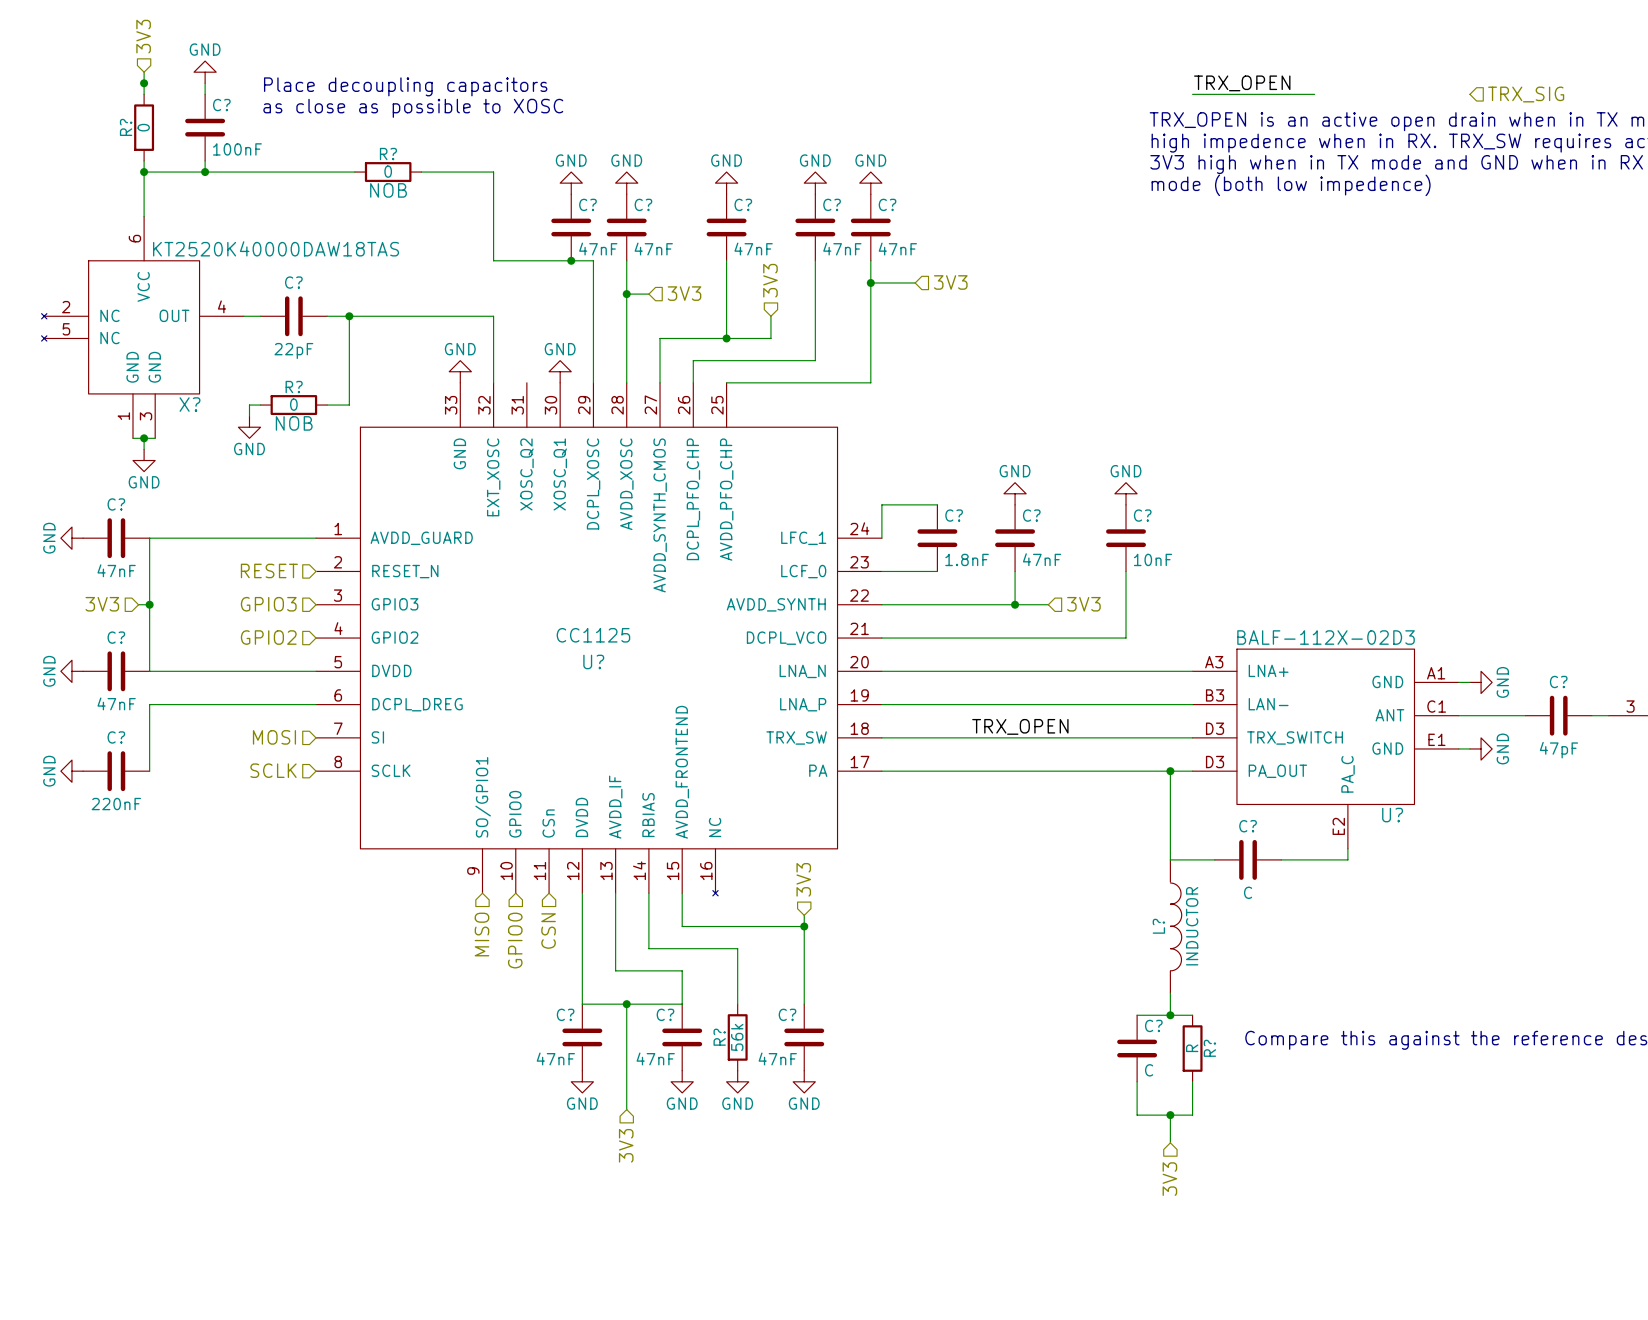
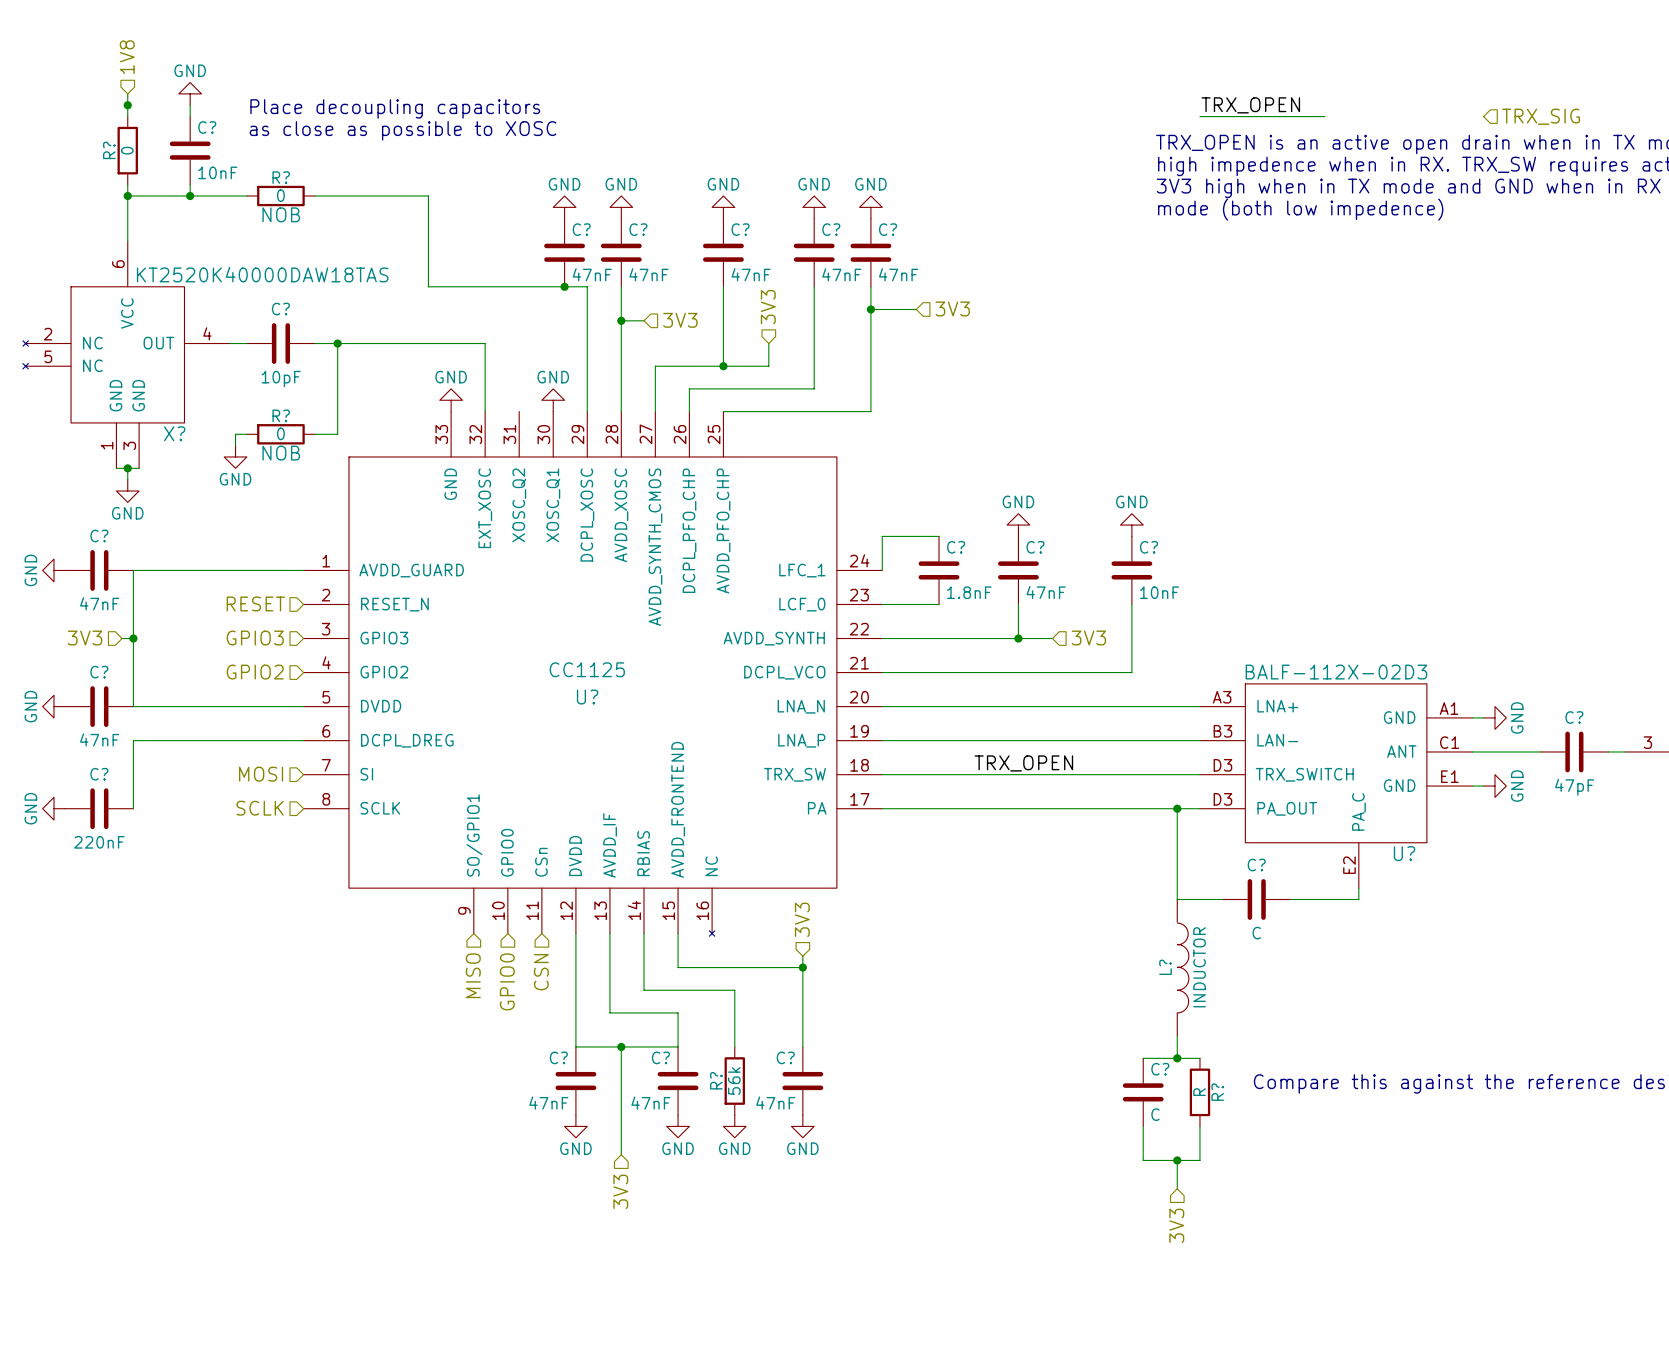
hierarchical label: 3V3 (143, 36) -> 1V8 (127, 57)
C? value: 100nF (237, 149) -> 10nF (217, 172)
wire: (260, 172) (327, 172) -> (343, 196) (411, 196)
R? position: (388, 172) -> (280, 196)
wire: (438, 172) (493, 172) (493, 260) -> (428, 196) (428, 286) (485, 286)
C? value: 22pF (293, 350) -> 10pF (281, 379)

